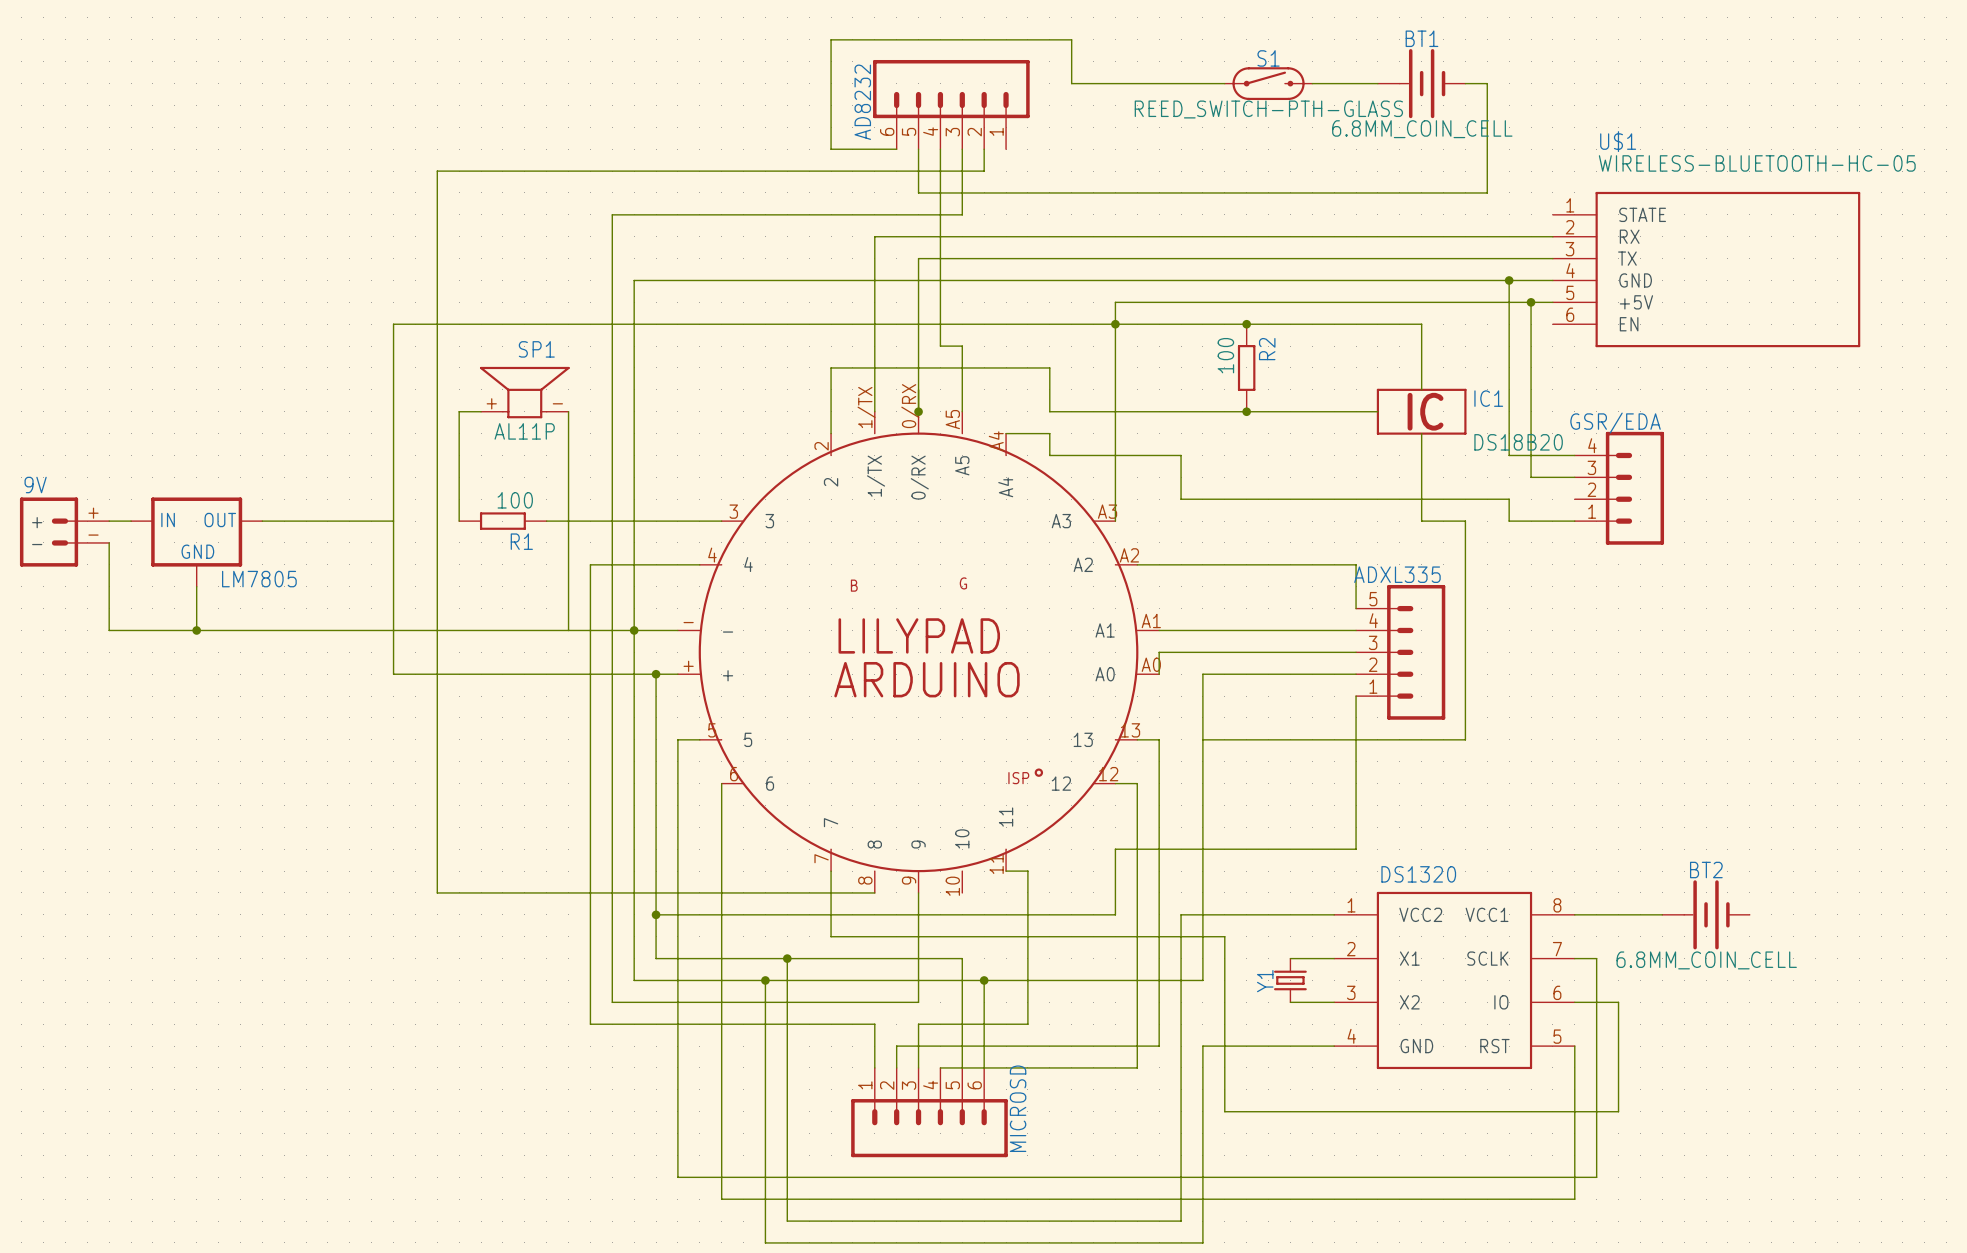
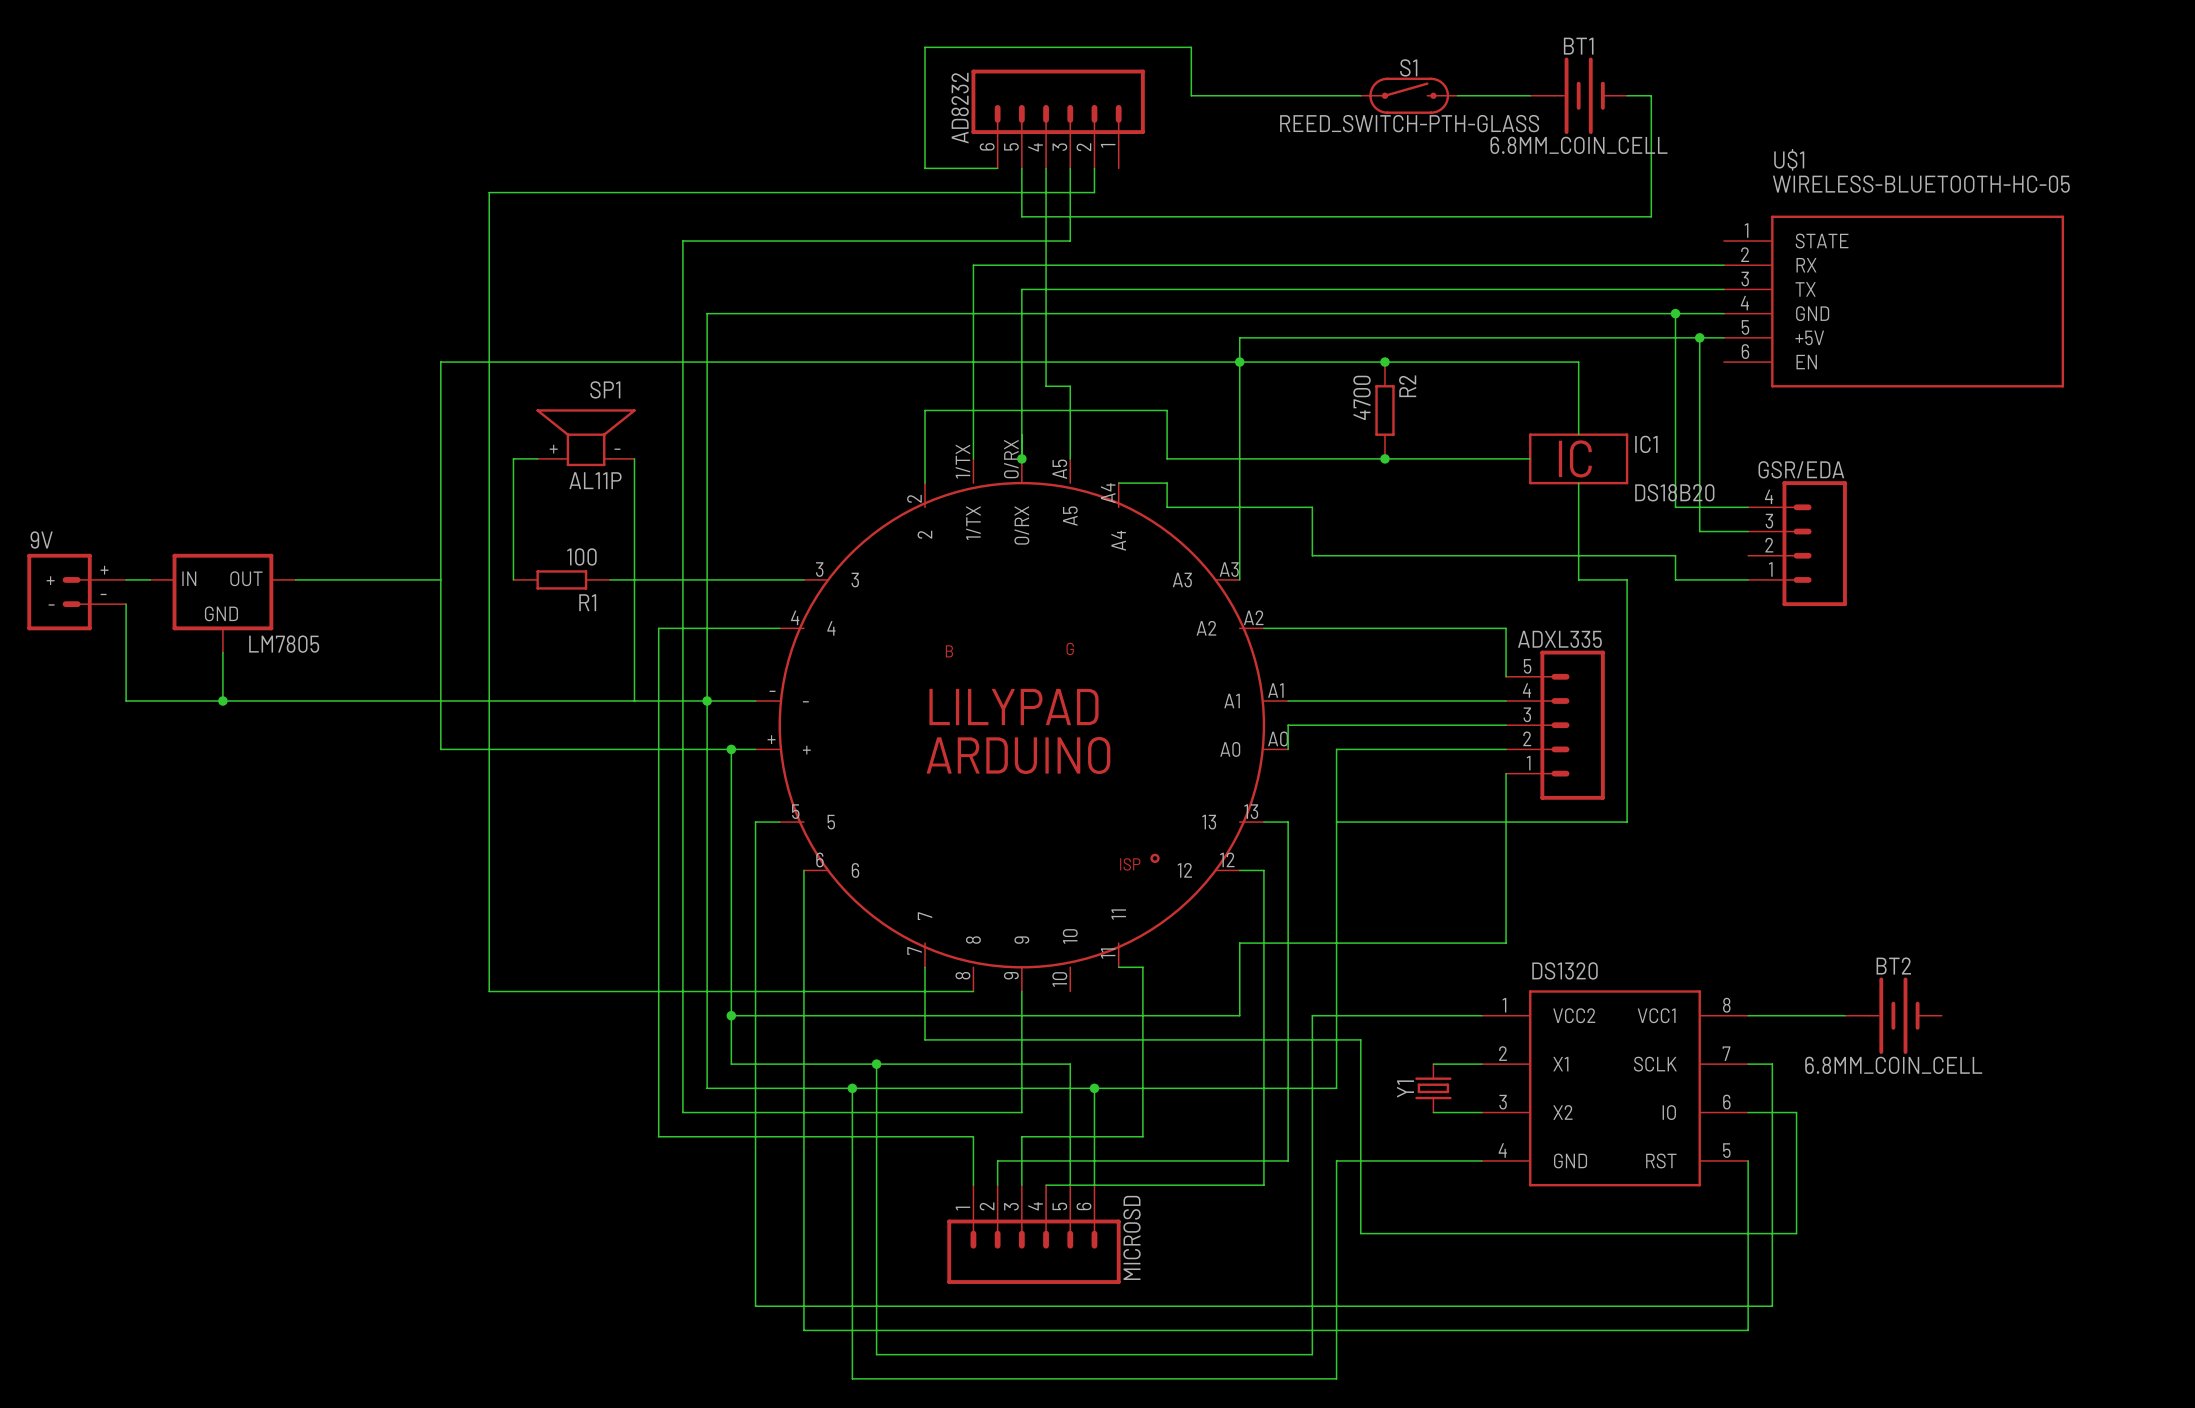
R2 value: 100 (1225, 355) -> 4700 (1362, 397)

